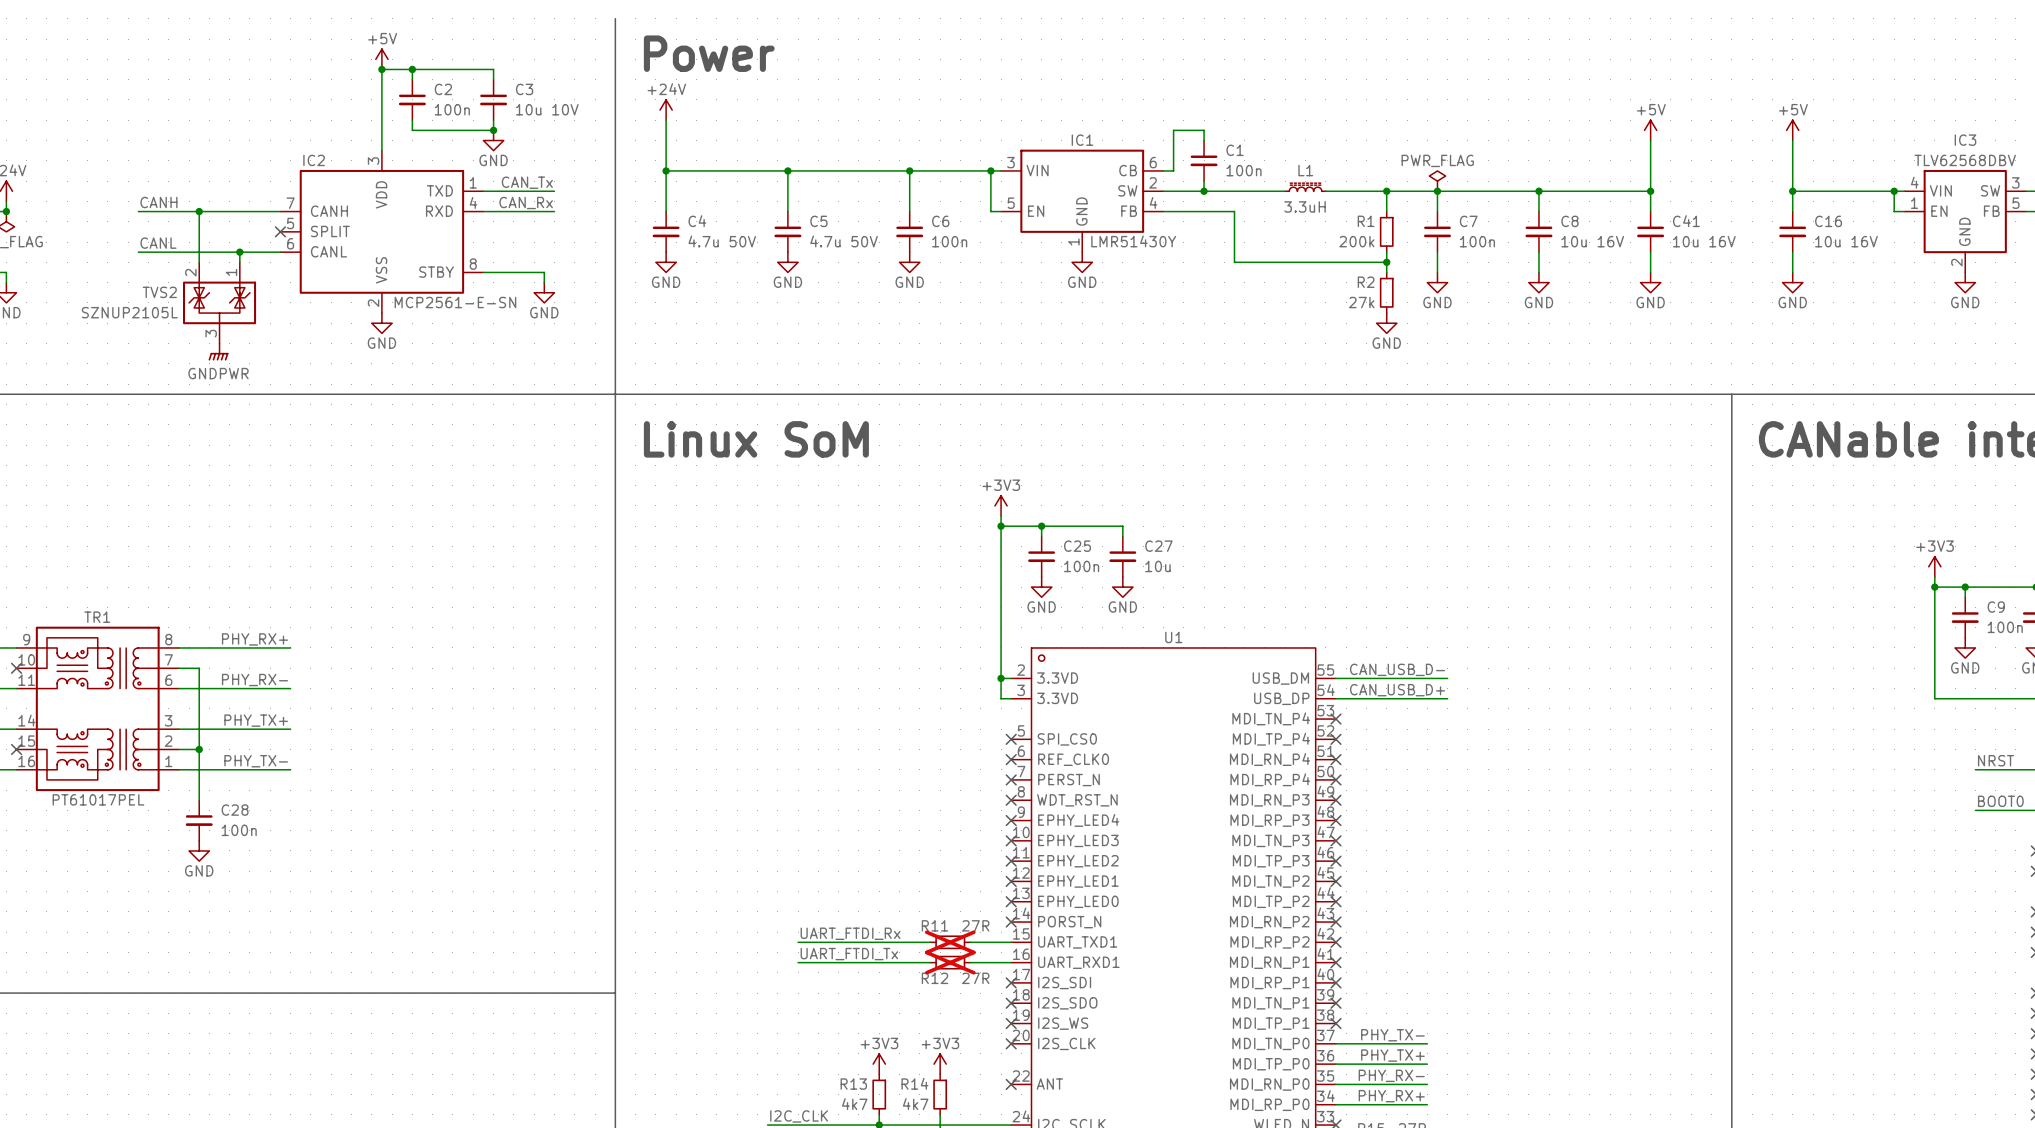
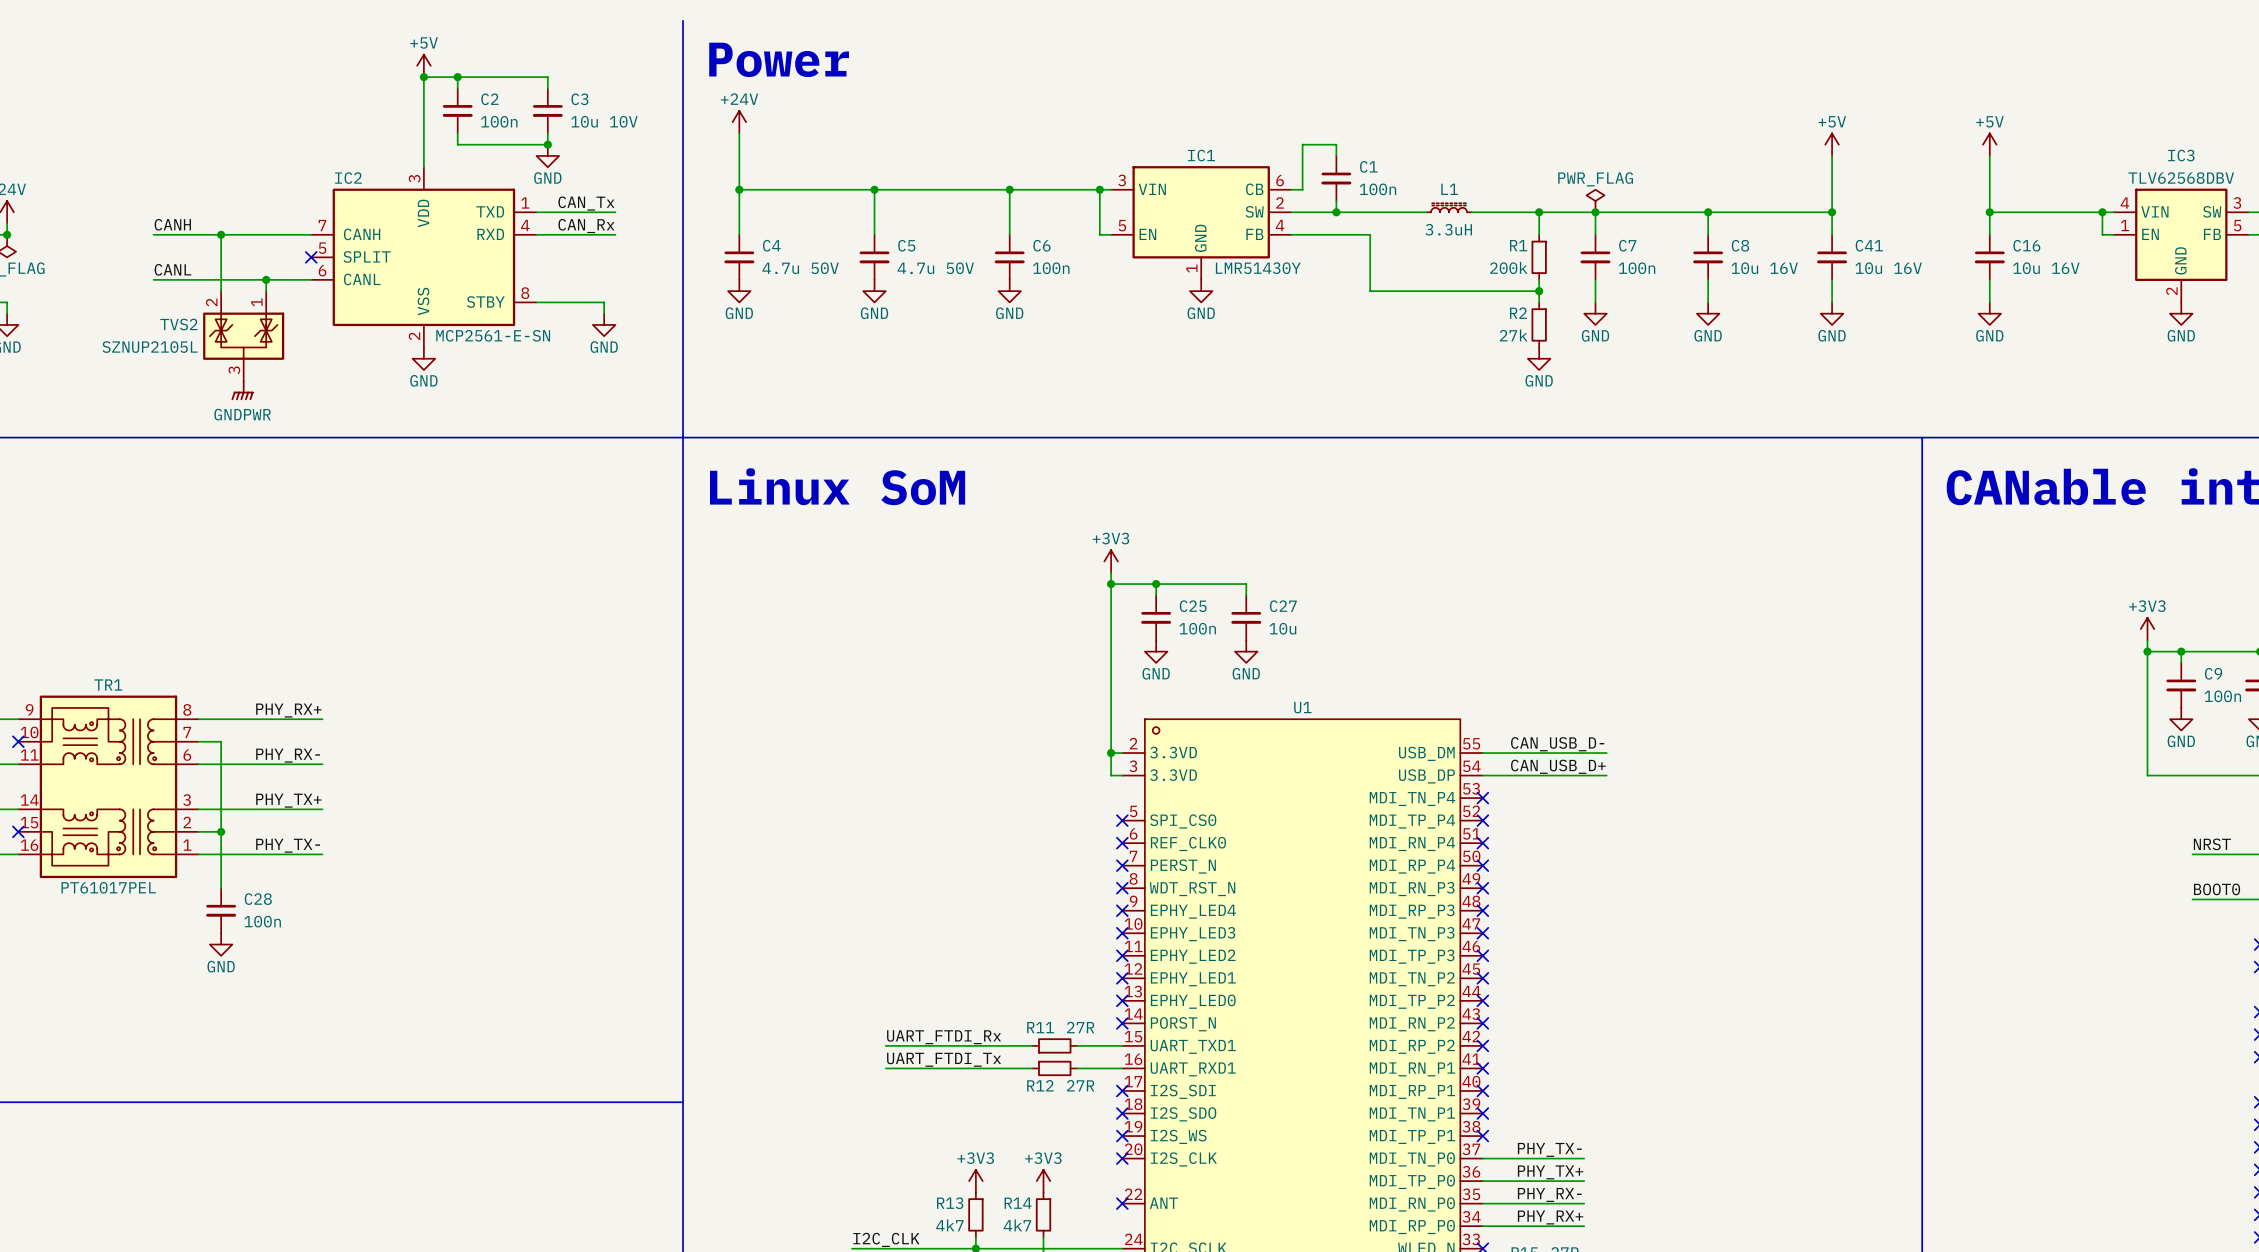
R11 do-not-place cross: (950, 942) -> none
R12 do-not-place cross: (950, 962) -> none

